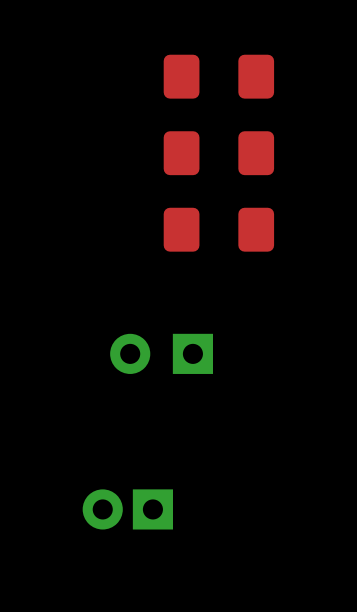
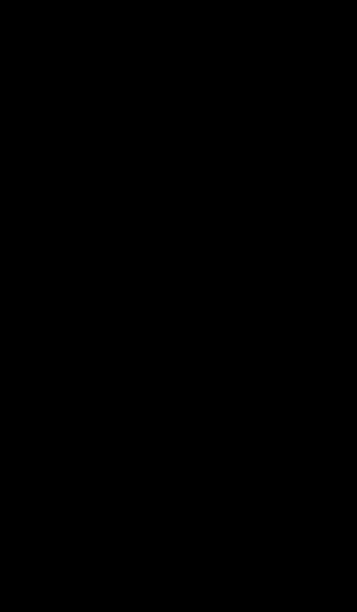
part: (218, 76) -> none
part: (218, 153) -> none
part: (218, 229) -> none
part: (161, 353) -> none
part: (127, 509) -> none

